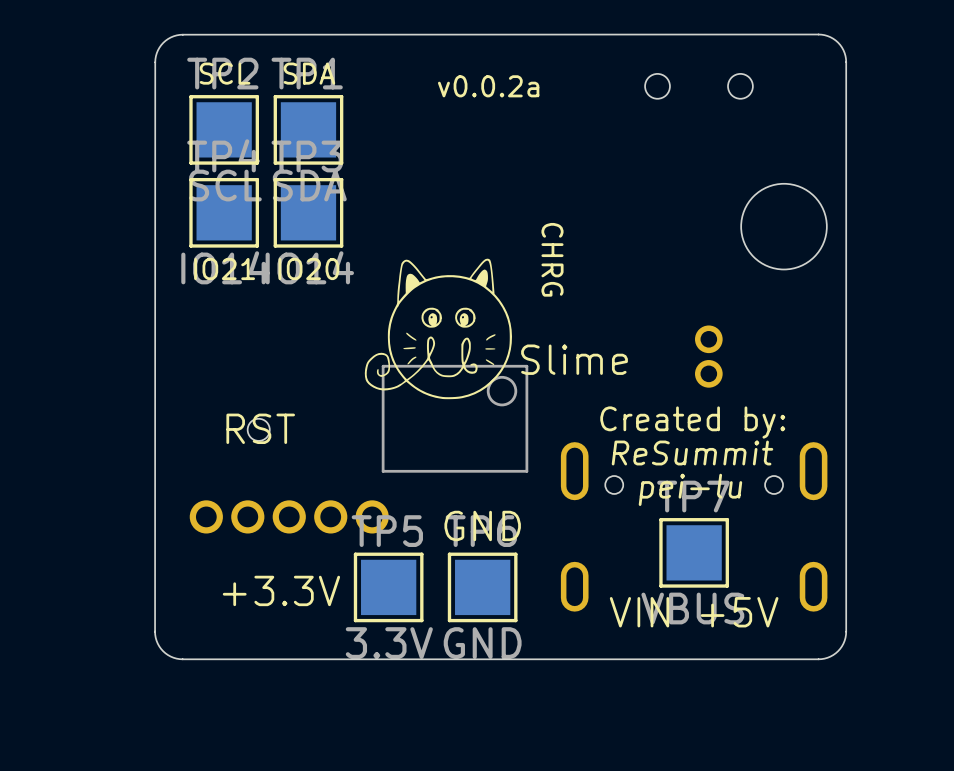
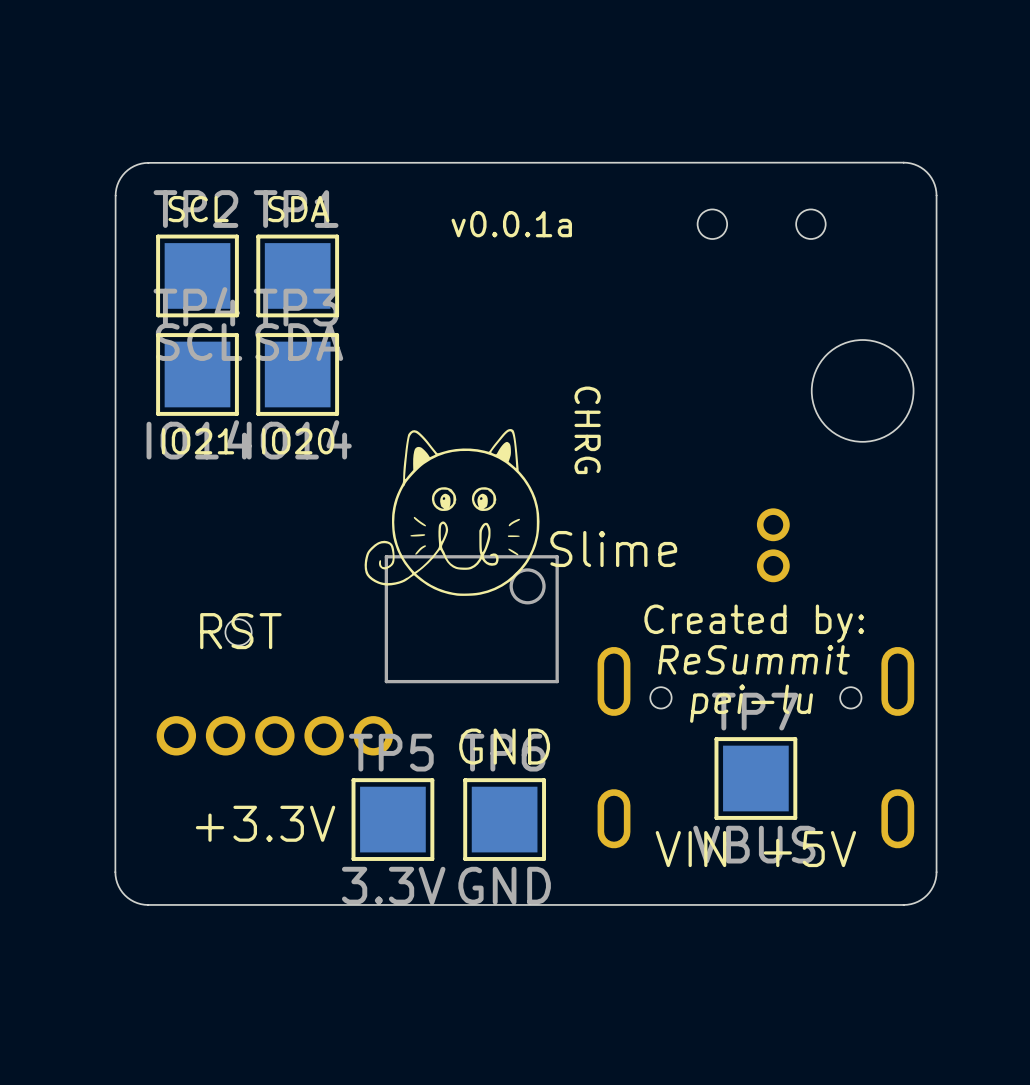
text: v0.0.2a (488, 86) -> v0.0.1a (511, 224)

